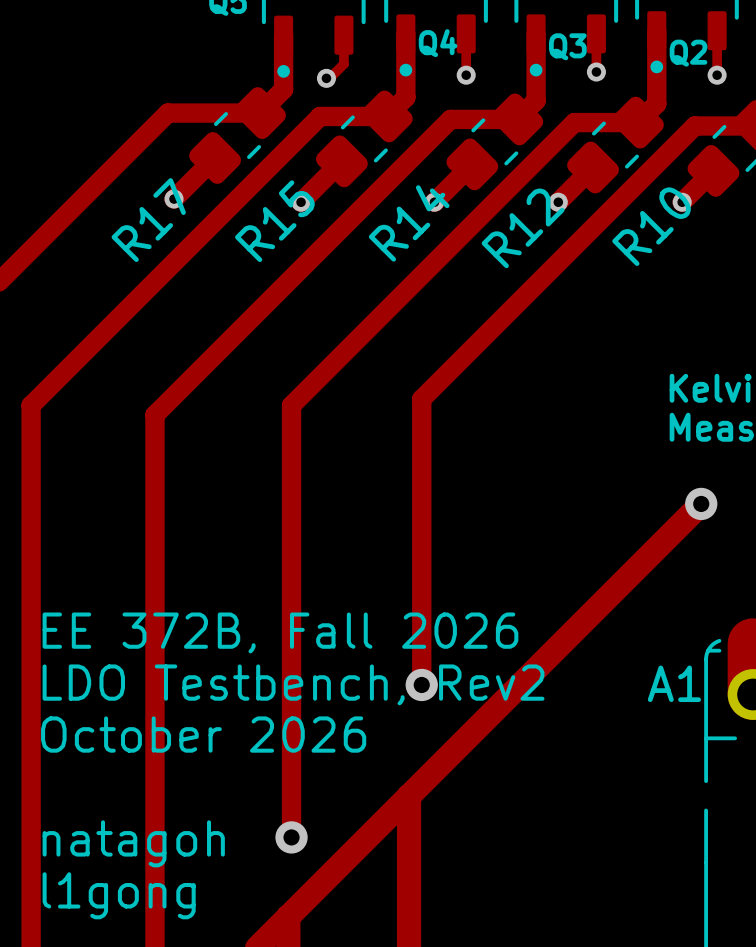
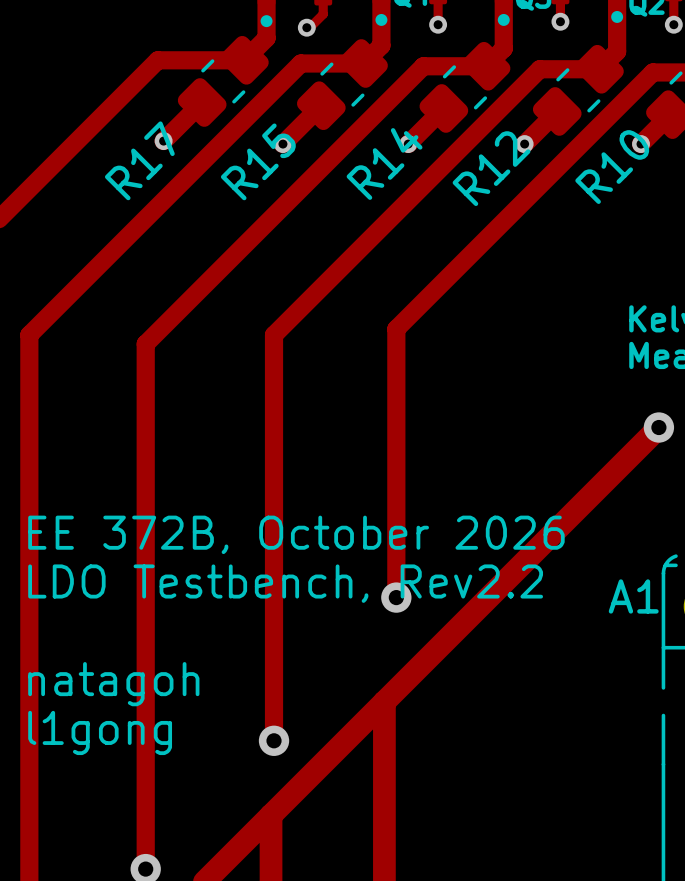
text: EE 372B, Fall 2026 (280, 632) -> EE 372B, October 2026 (296, 534)
text: LDO Testbench, Rev2 (293, 684) -> LDO Testbench, Rev2.2 (285, 583)
text: October 2026 (203, 734) -> none
text: none -> natagoh (113, 684)
text: natagoh (133, 843) -> l1gong (100, 732)
text: l1gong (119, 895) -> none

